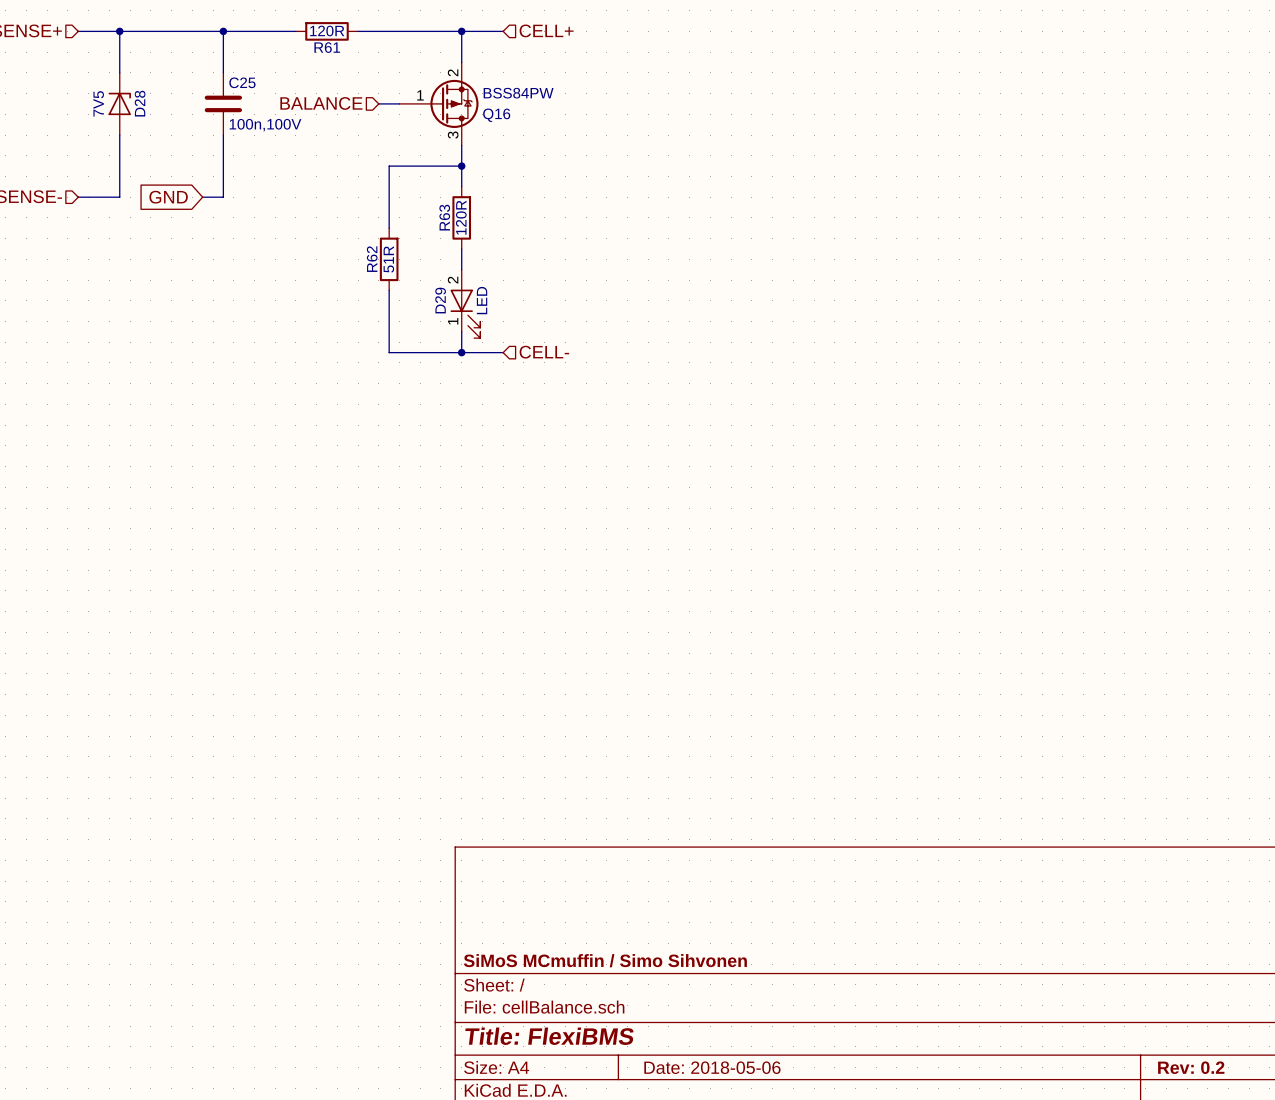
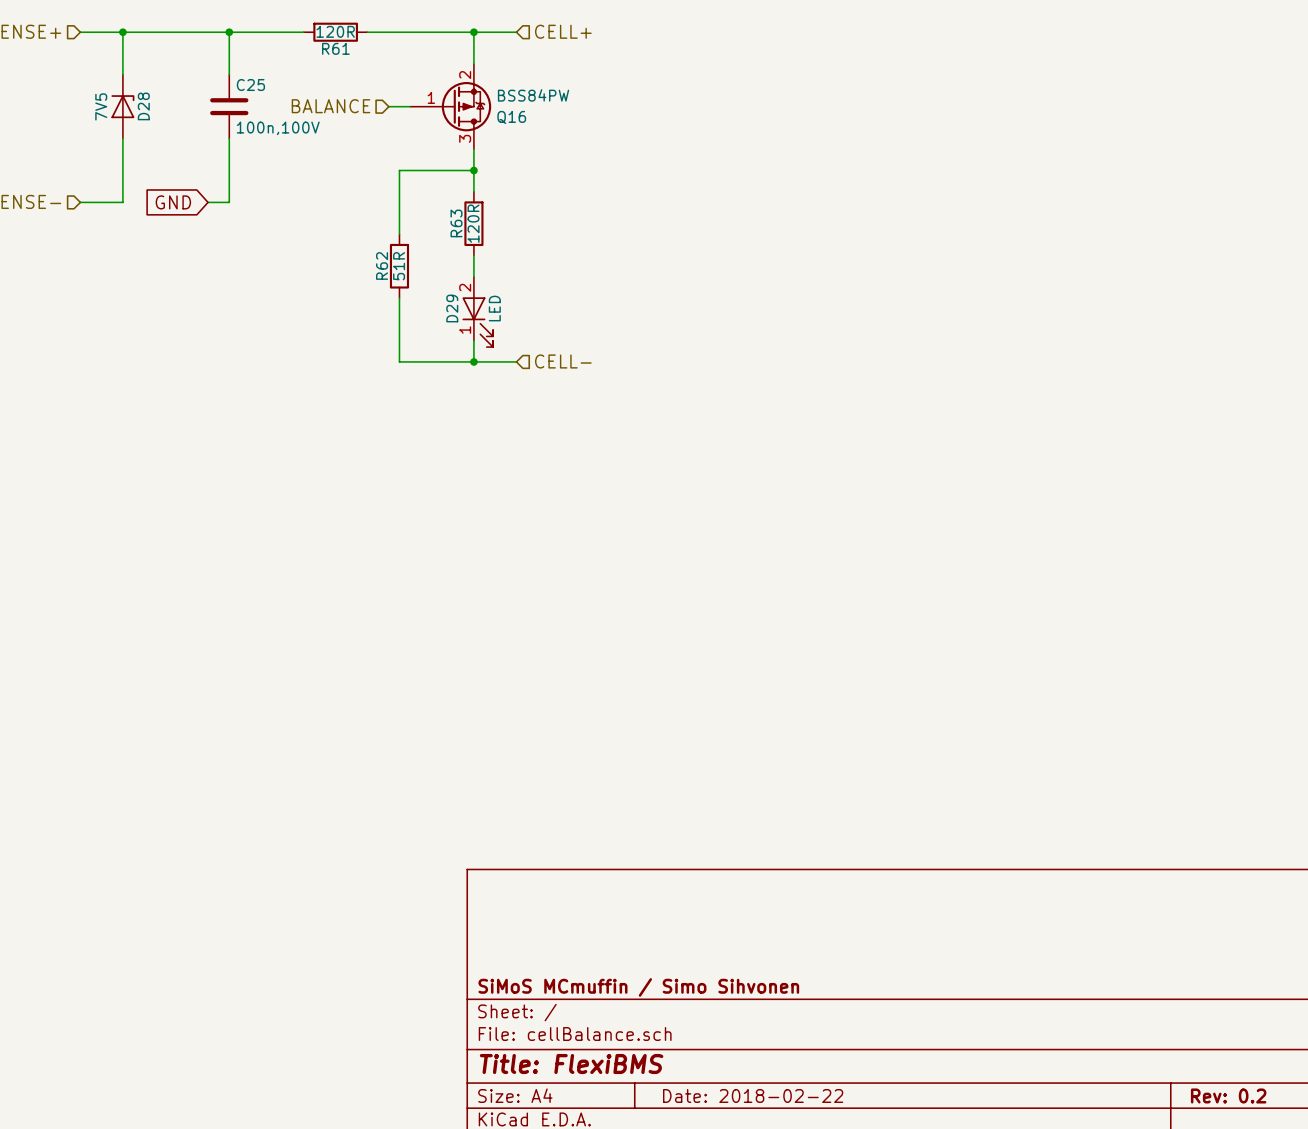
title block: Date: 2018-05-06 (712, 1067) -> Date: 2018-02-22 (753, 1095)

